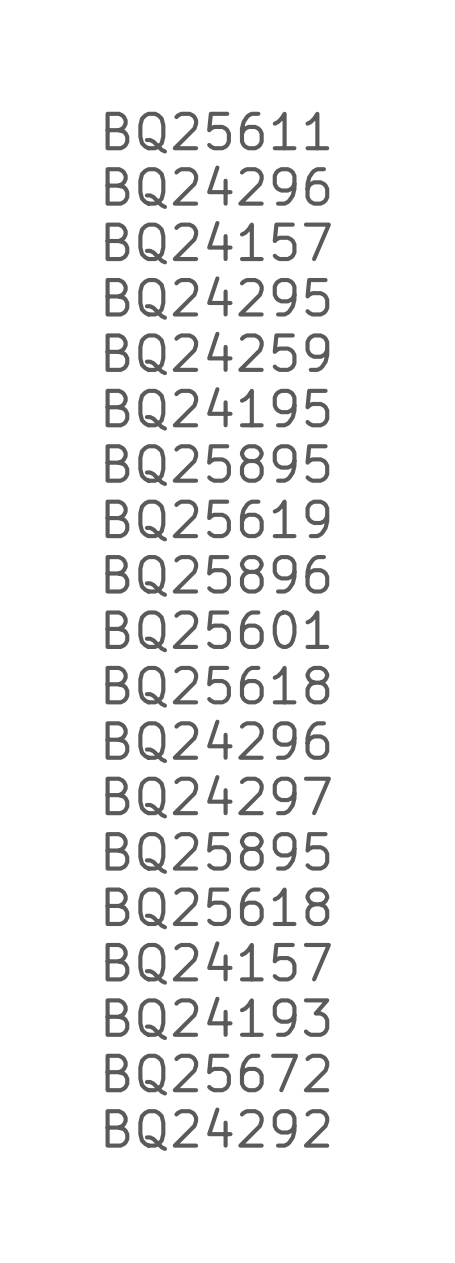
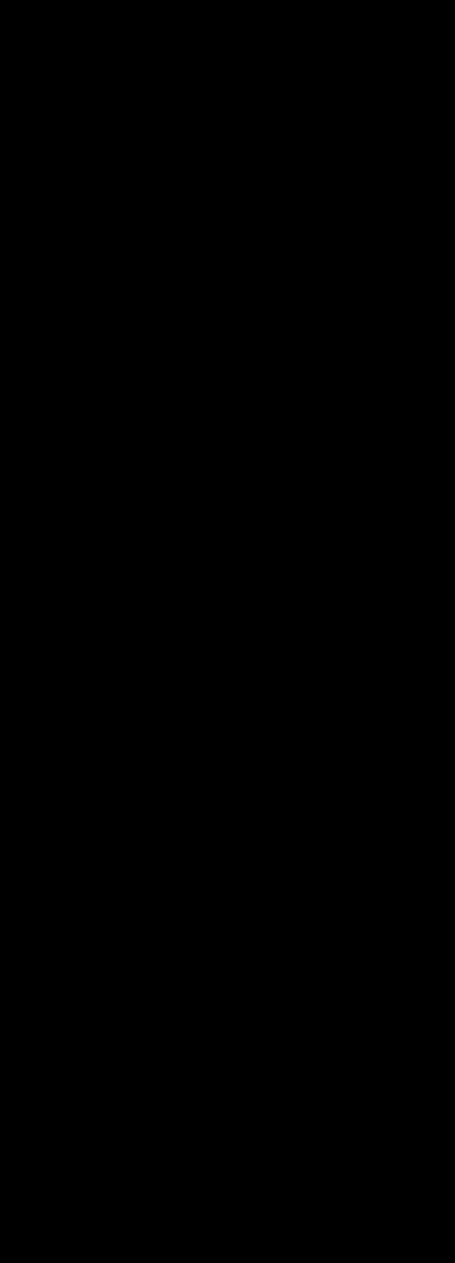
text: BQ25611 (217, 132) -> none
text: BQ24296 (217, 187) -> none
text: BQ24157 (218, 242) -> none
text: BQ24295 (217, 298) -> none
text: BQ24259 (217, 353) -> none
text: BQ24195 (217, 408) -> none
text: BQ25895 (217, 465) -> none
text: BQ25619 (217, 520) -> none
text: BQ25896 (217, 575) -> none
text: BQ25601 (217, 631) -> none
text: BQ25618 (217, 686) -> none
text: BQ24296 (217, 741) -> none
text: BQ24297 (218, 796) -> none
text: BQ25895 (217, 852) -> none
text: BQ25618 (217, 908) -> none
text: BQ24157 (218, 962) -> none
text: BQ24193 (217, 1018) -> none
text: BQ25672 (217, 1074) -> none
text: BQ24292 (217, 1129) -> none

